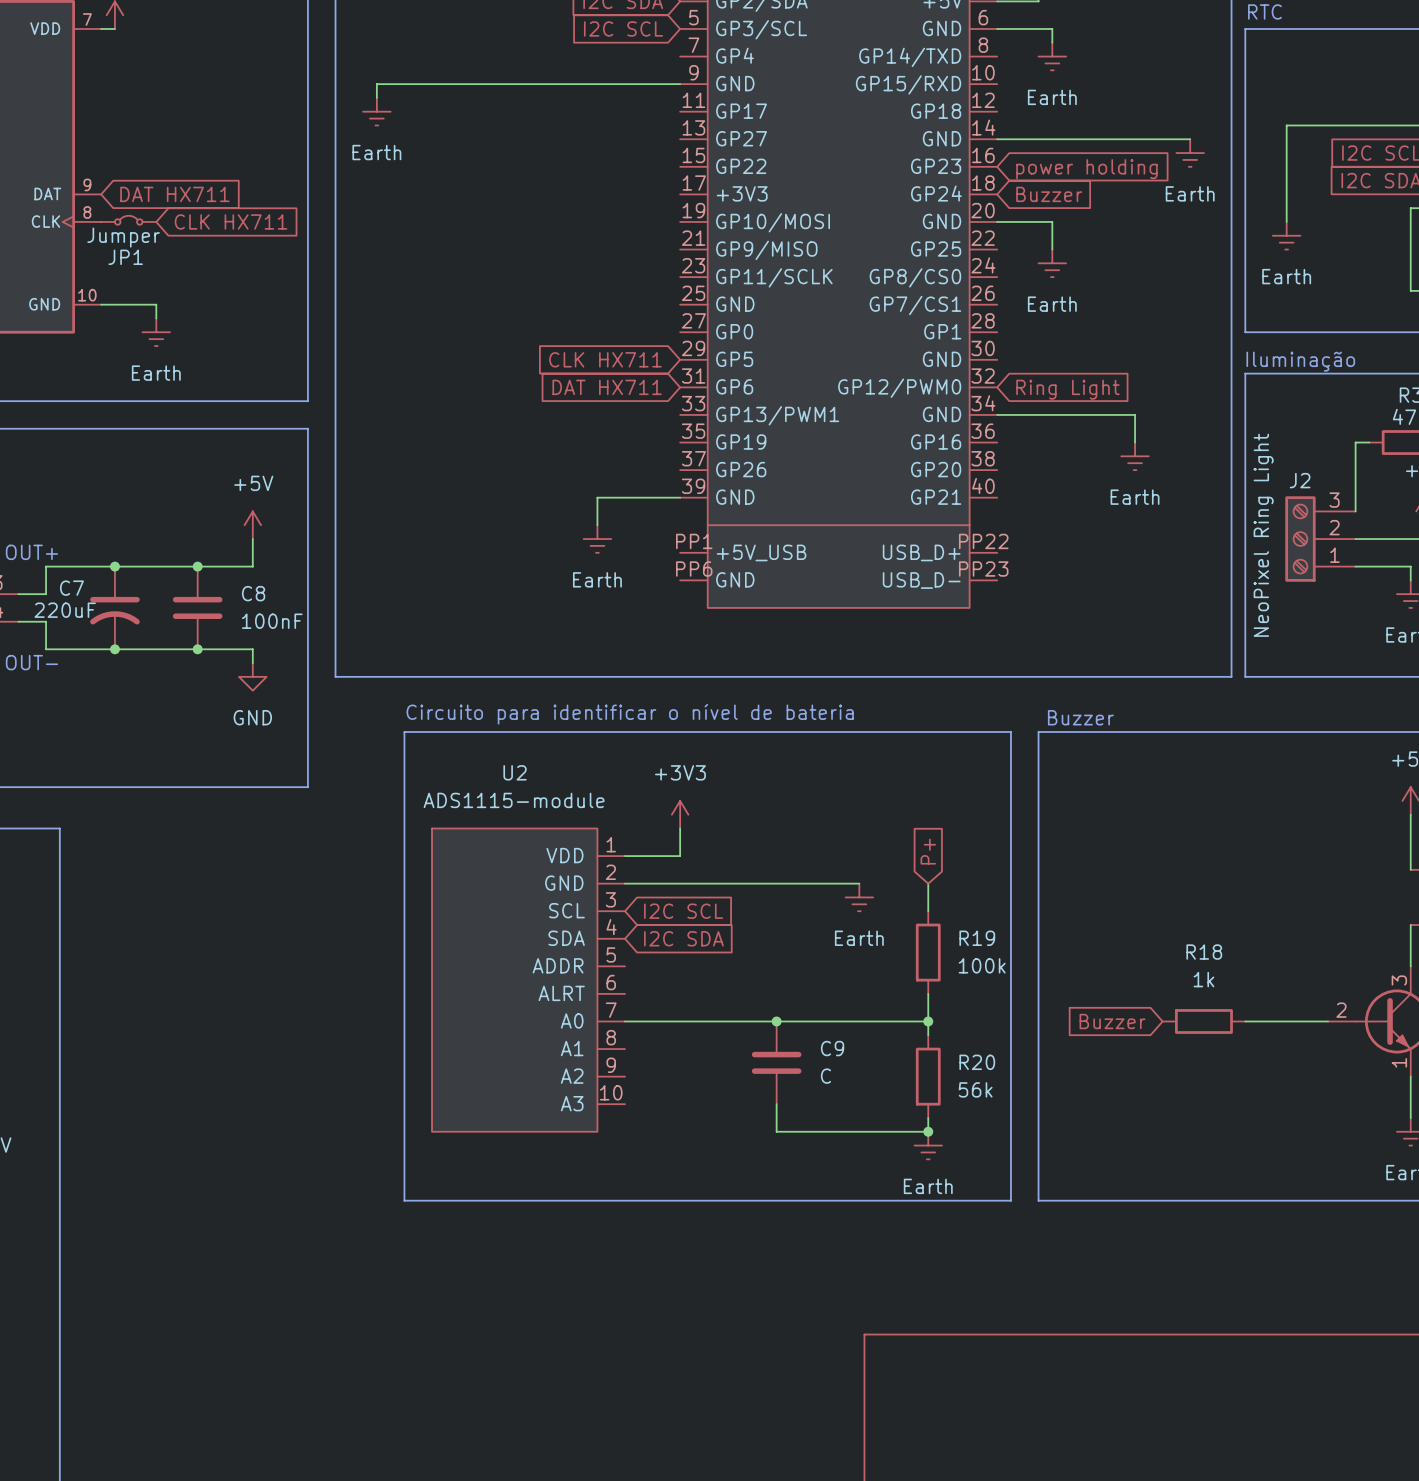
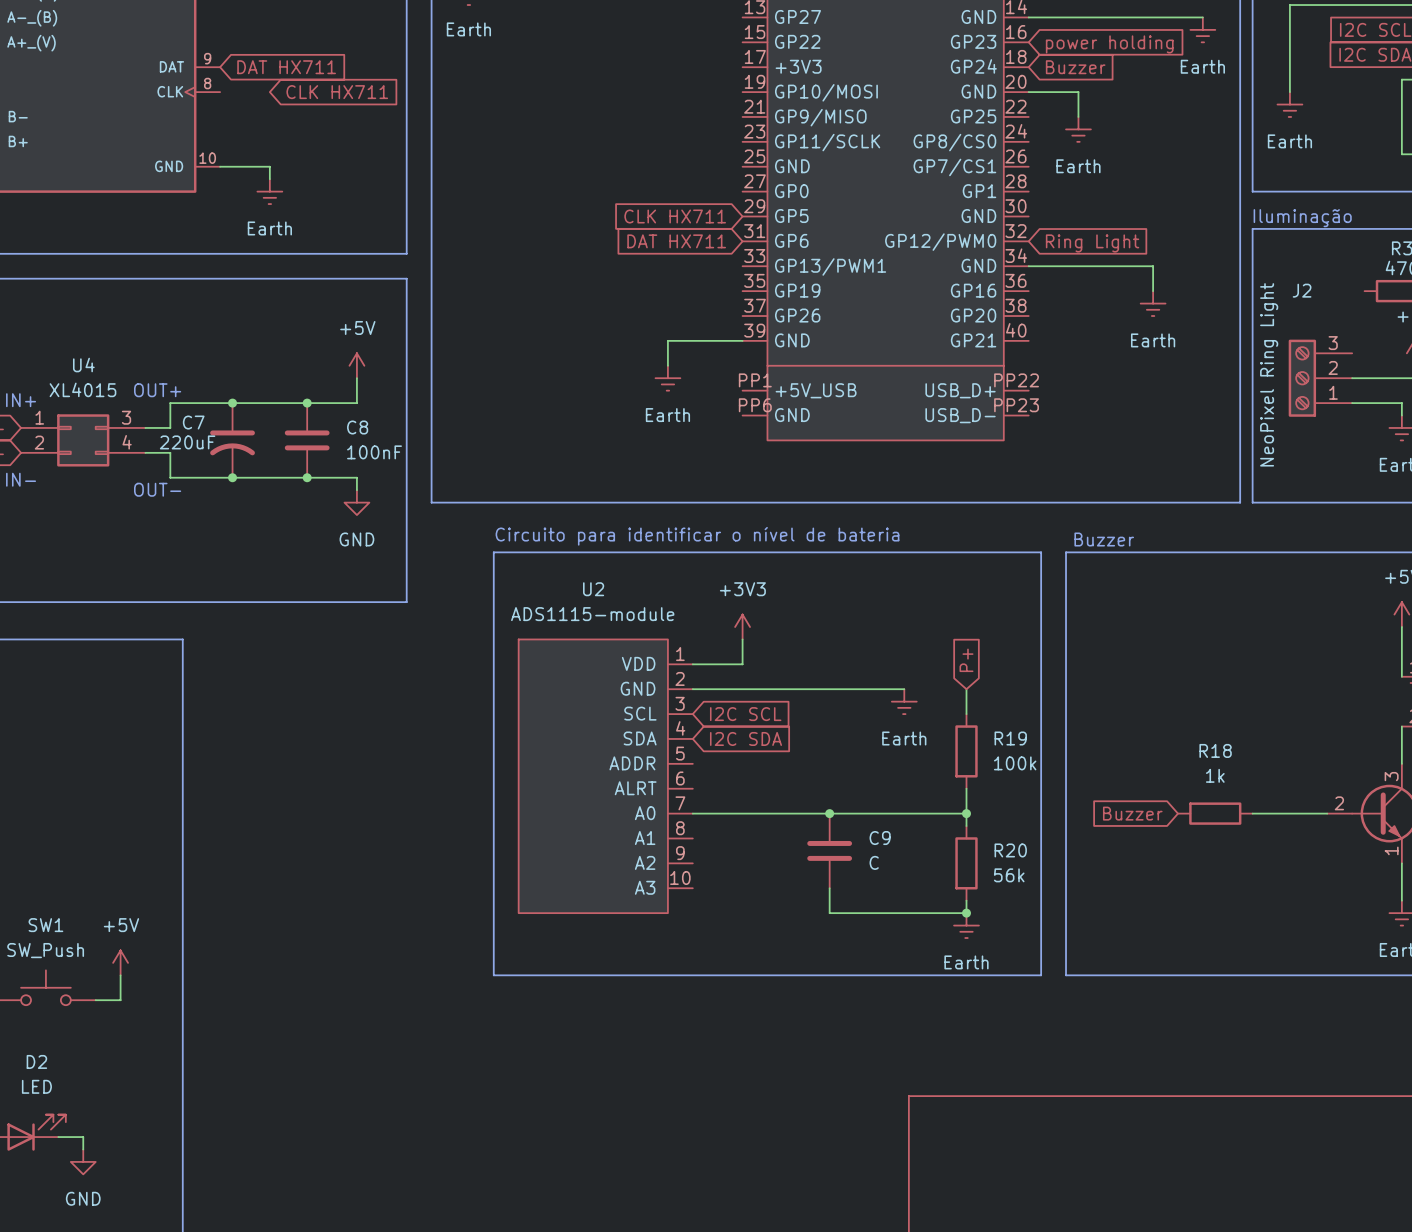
JP1: Jumper (128, 220) -> none
wire: (1369, 442) (1355, 442) (1355, 511) -> none
J2 name position: J2 (1300, 480) -> J2 (1302, 290)

